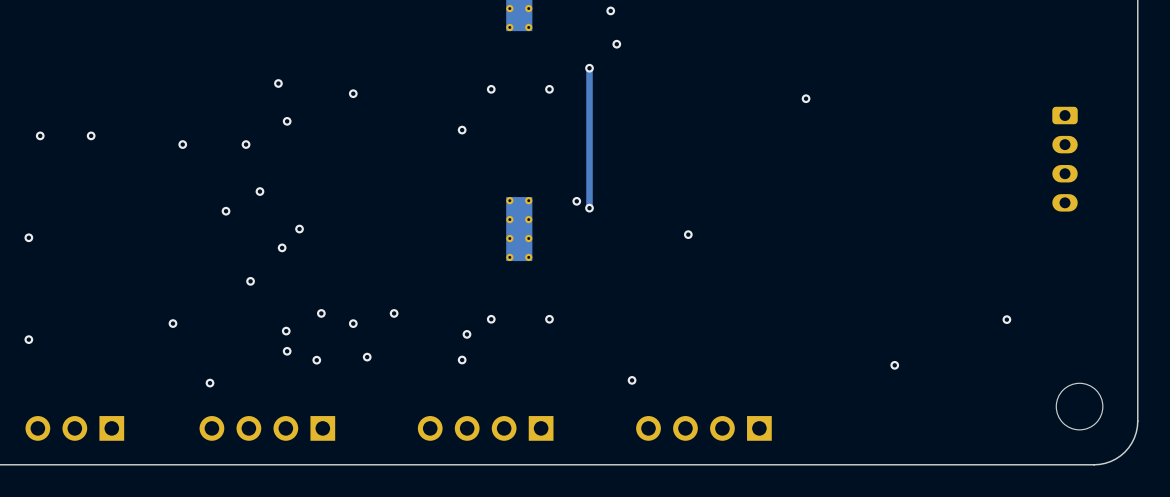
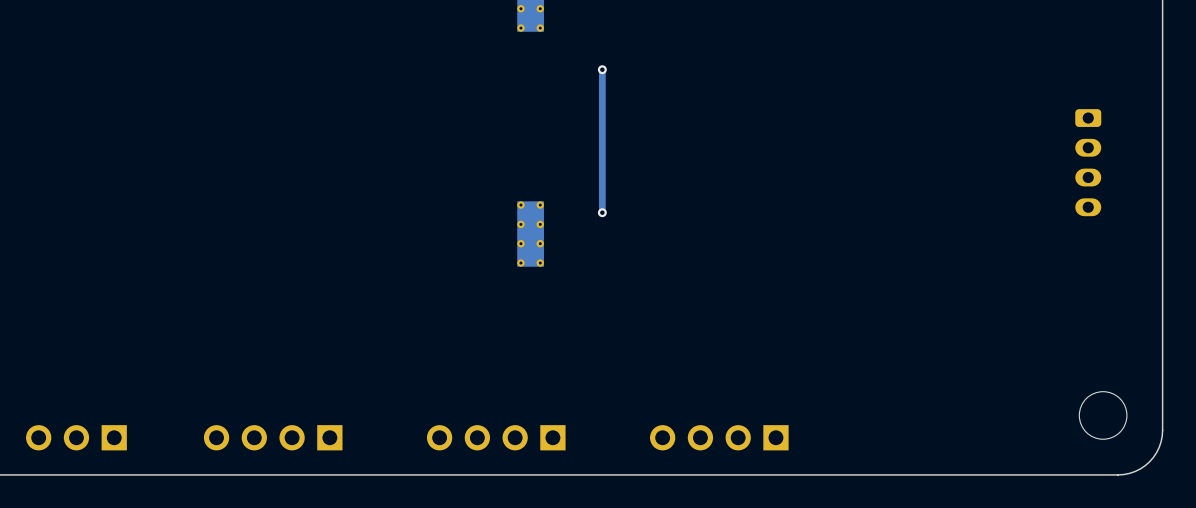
via: (610, 10) -> none
via: (616, 44) -> none
via: (278, 83) -> none
via: (491, 89) -> none
via: (549, 89) -> none
via: (353, 93) -> none
via: (806, 98) -> none
via: (287, 121) -> none
via: (462, 130) -> none
via: (40, 135) -> none
via: (91, 135) -> none
via: (182, 144) -> none
via: (246, 144) -> none
via: (259, 191) -> none
via: (576, 201) -> none
via: (226, 211) -> none
via: (299, 229) -> none
via: (688, 234) -> none
via: (28, 237) -> none
via: (282, 247) -> none
via: (250, 281) -> none
via: (321, 313) -> none
via: (394, 313) -> none
via: (491, 319) -> none
via: (549, 319) -> none
via: (1006, 319) -> none
via: (172, 323) -> none
via: (353, 323) -> none
via: (286, 331) -> none
via: (466, 334) -> none
via: (28, 339) -> none
via: (287, 351) -> none
via: (367, 357) -> none
via: (316, 360) -> none
via: (462, 360) -> none
via: (894, 365) -> none
via: (632, 380) -> none
via: (210, 383) -> none

